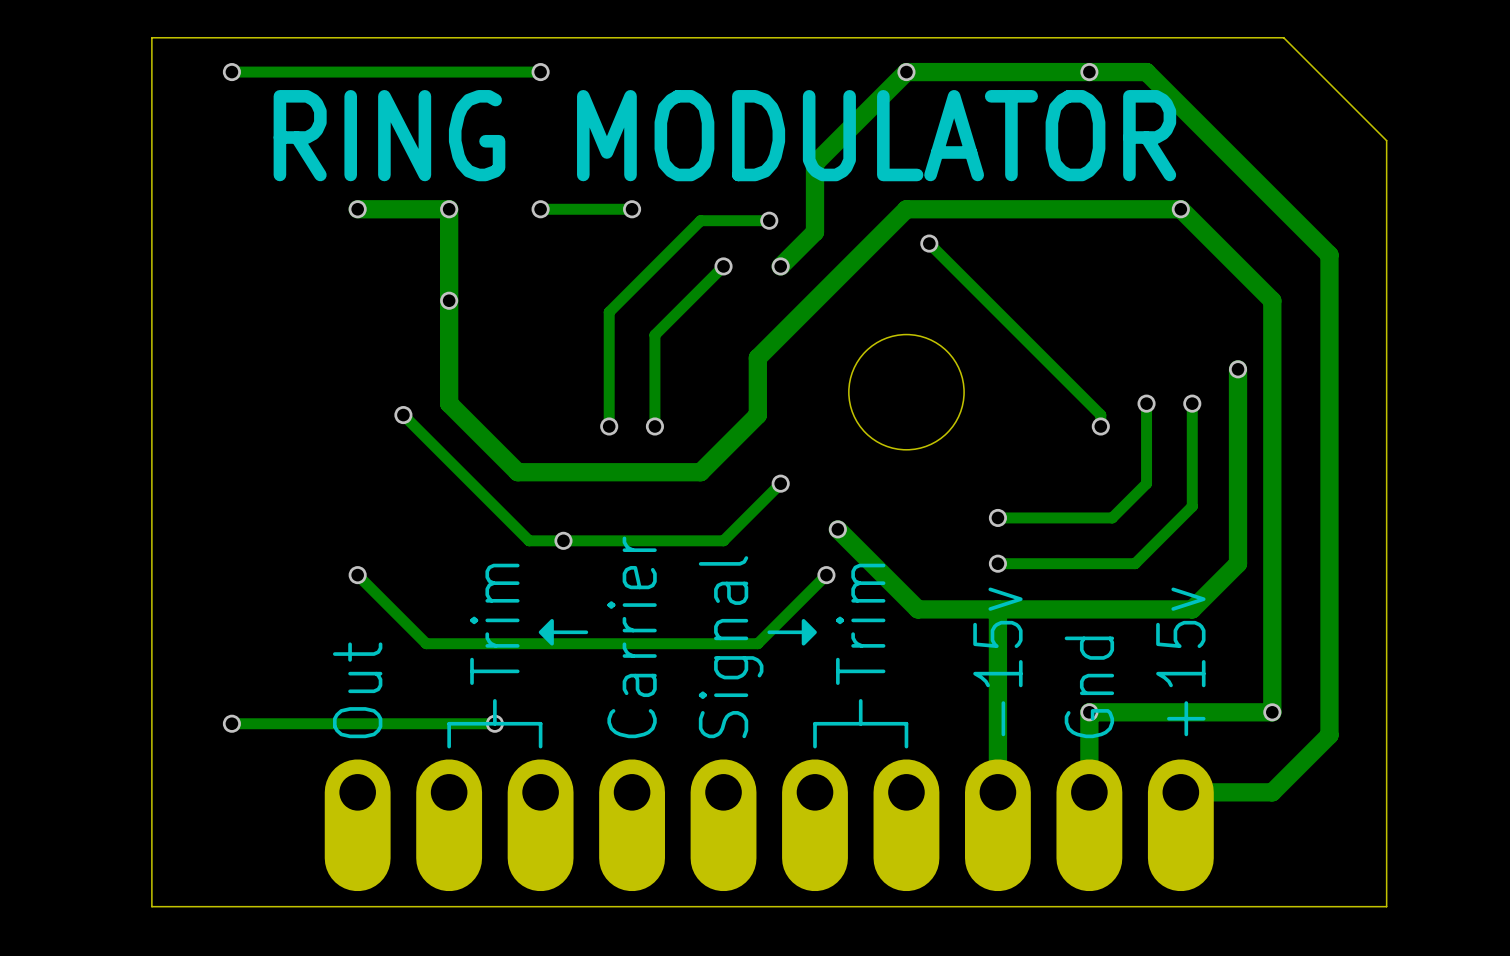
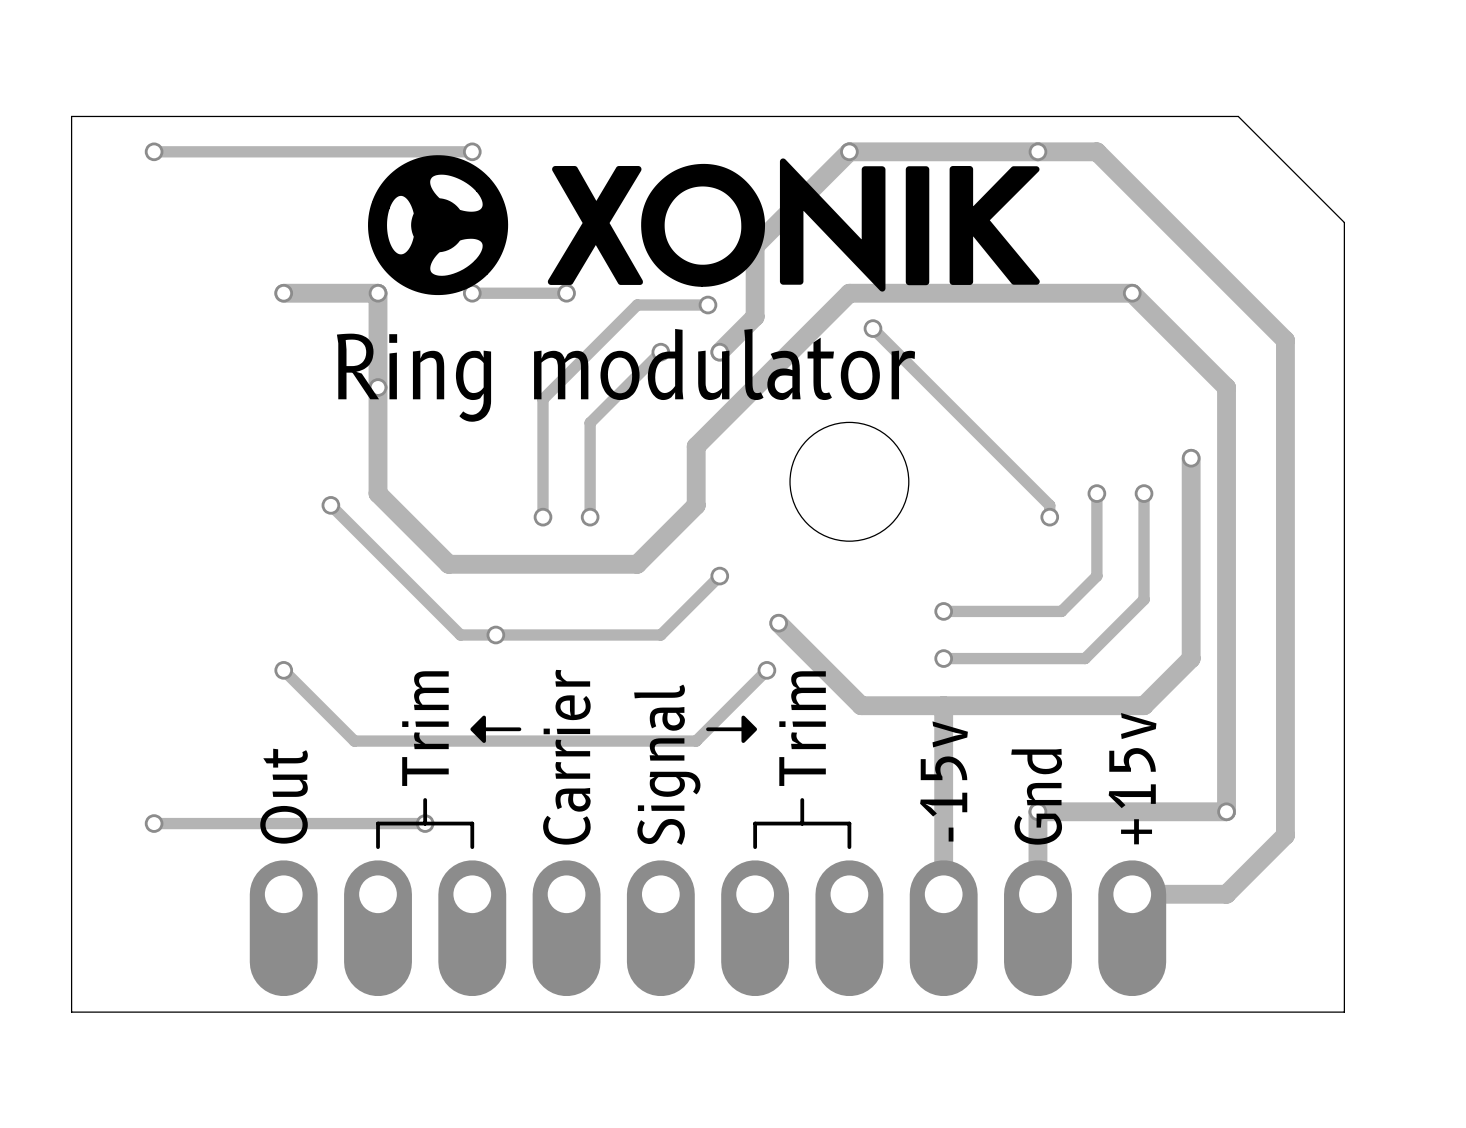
drawing: none -> [368, 155, 1040, 296]
text: RING MODULATOR (724, 135) -> none
text: none -> Ring modulator (625, 375)

